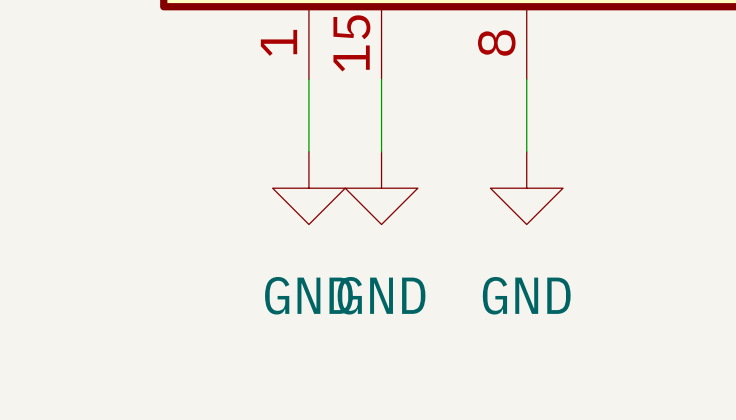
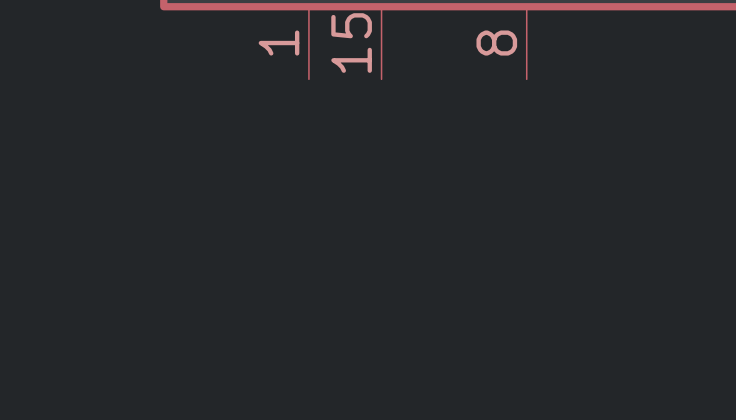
wire: (308, 79) (308, 151) -> none
wire: (381, 79) (381, 151) -> none
wire: (526, 79) (526, 151) -> none
power symbol: GND (308, 188) -> none
power symbol: GND (381, 188) -> none
power symbol: GND (526, 188) -> none

